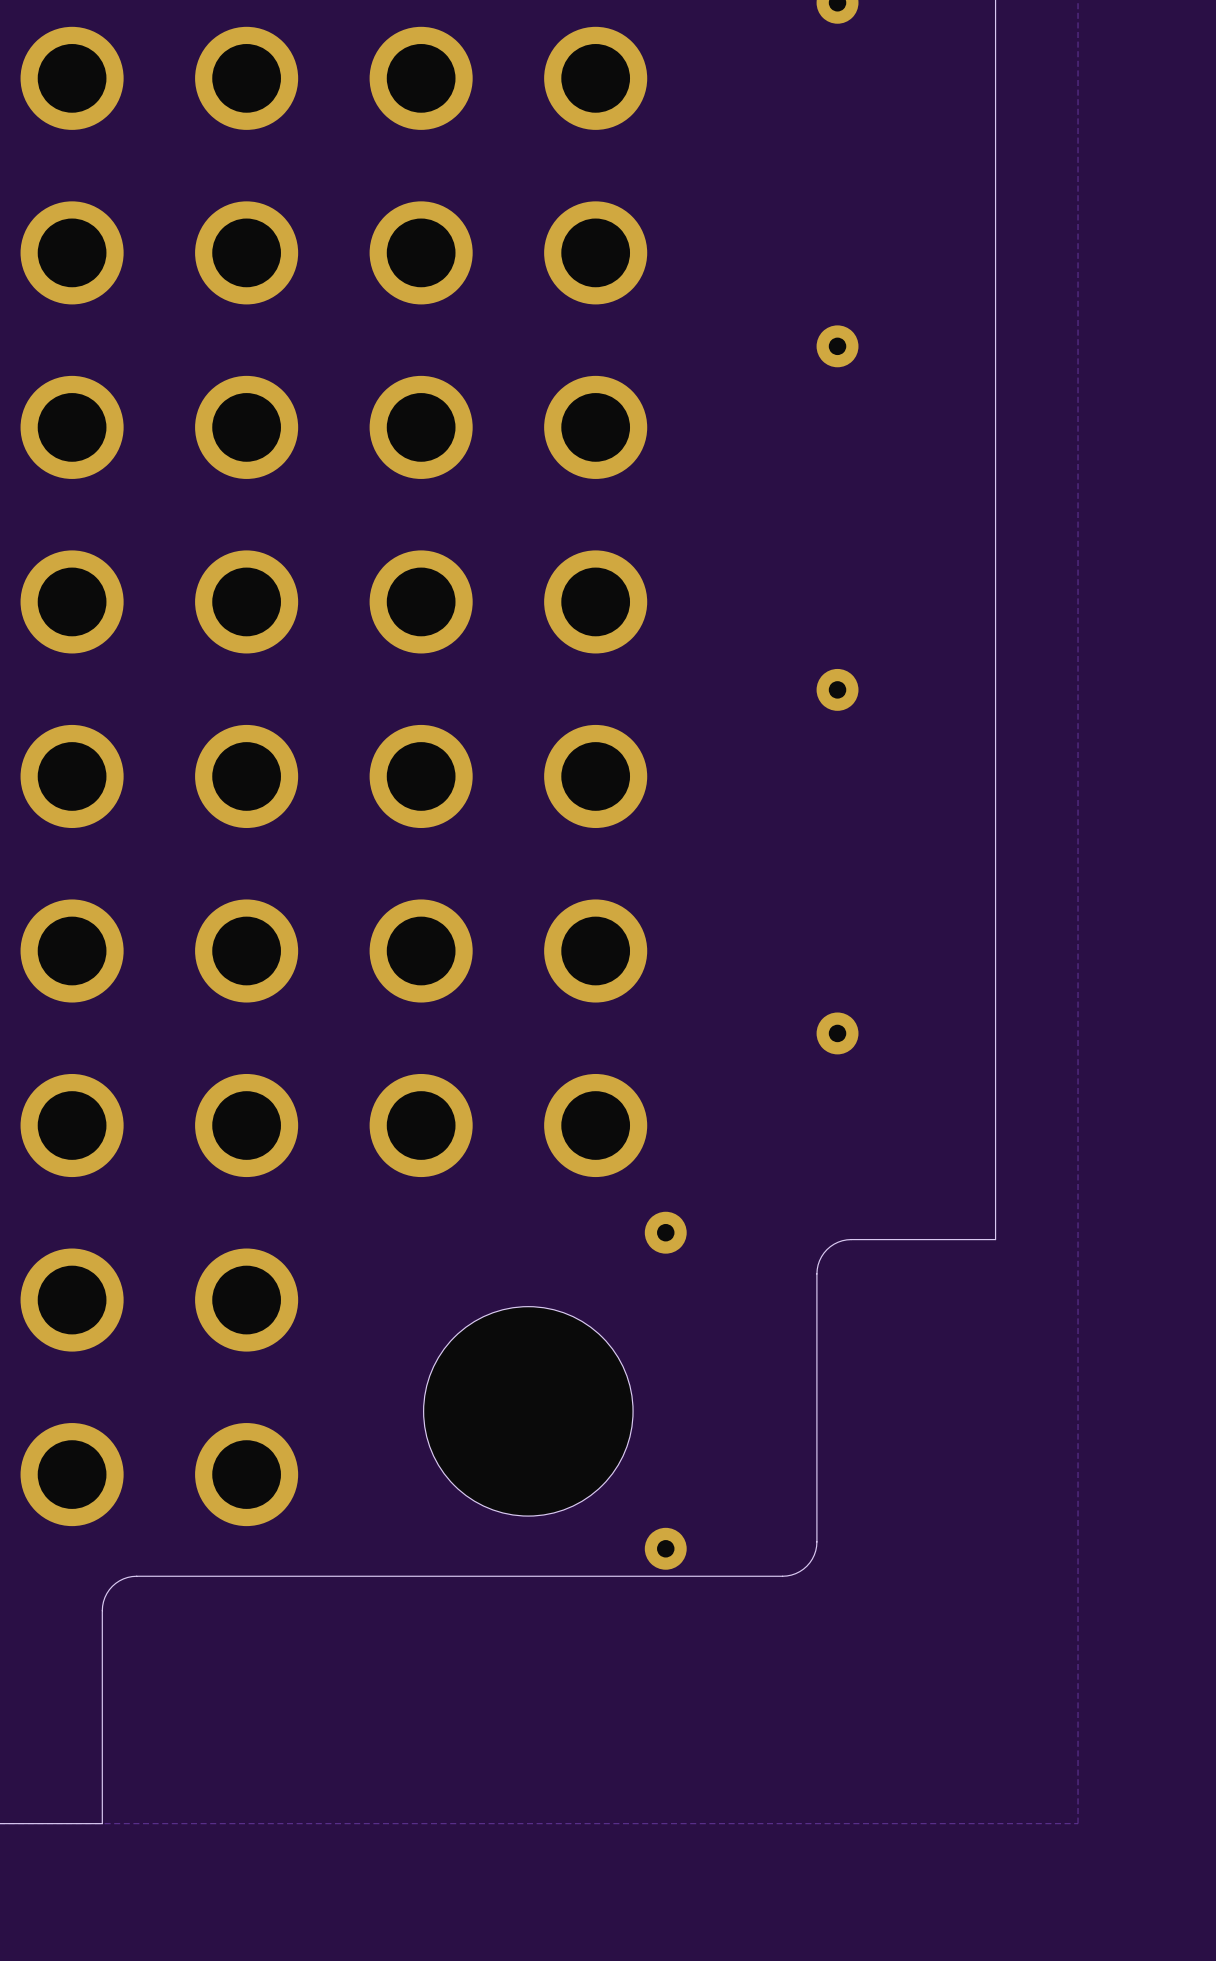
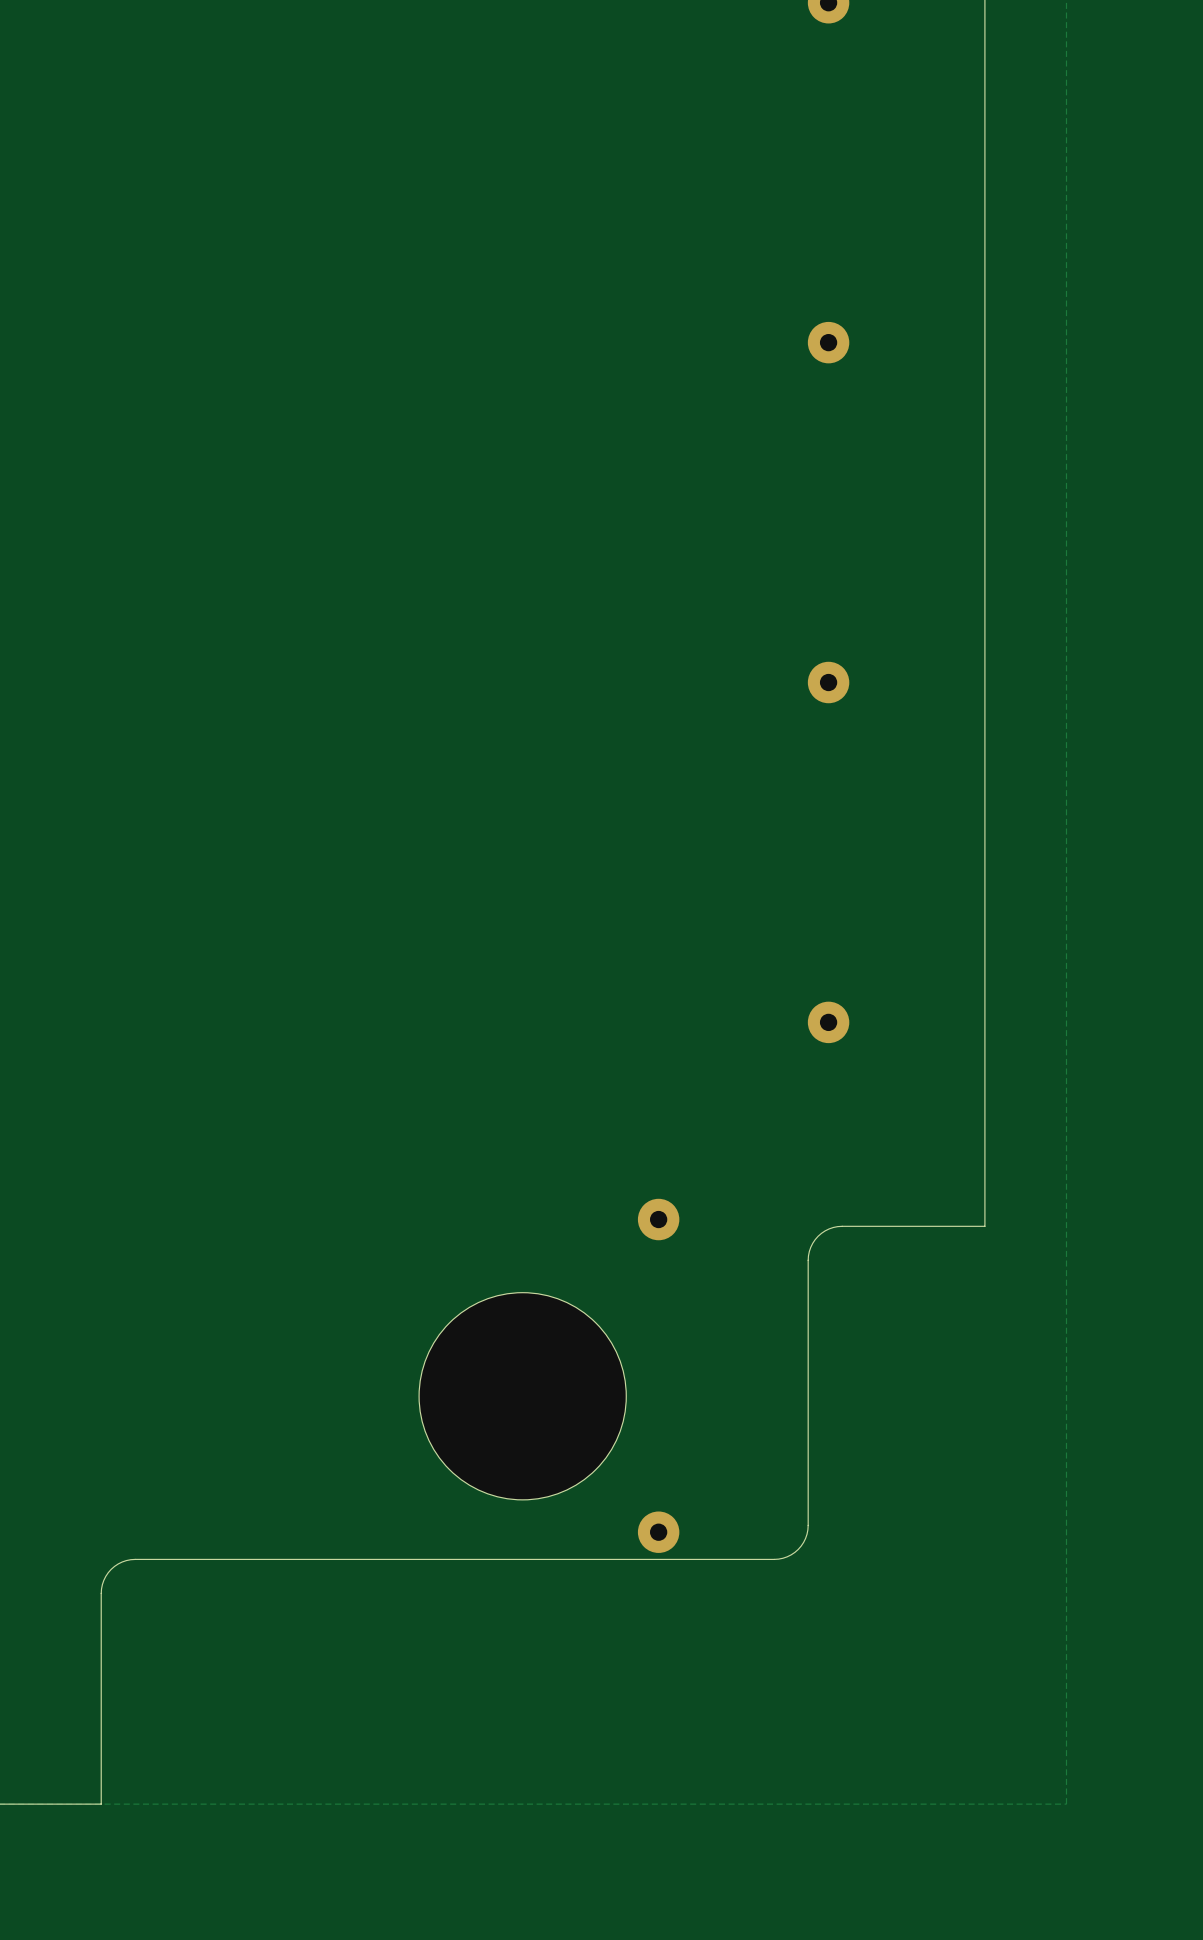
via: (72, 78) -> none
via: (246, 78) -> none
via: (421, 78) -> none
via: (595, 78) -> none
via: (72, 252) -> none
via: (246, 252) -> none
via: (421, 252) -> none
via: (595, 252) -> none
via: (72, 427) -> none
via: (246, 427) -> none
via: (421, 427) -> none
via: (595, 427) -> none
via: (72, 601) -> none
via: (246, 601) -> none
via: (421, 601) -> none
via: (595, 601) -> none
via: (72, 776) -> none
via: (246, 776) -> none
via: (421, 776) -> none
via: (595, 776) -> none
via: (72, 950) -> none
via: (246, 950) -> none
via: (421, 950) -> none
via: (595, 950) -> none
via: (72, 1125) -> none
via: (246, 1125) -> none
via: (421, 1125) -> none
via: (595, 1125) -> none
via: (72, 1300) -> none
via: (246, 1300) -> none
via: (72, 1474) -> none
via: (246, 1474) -> none

